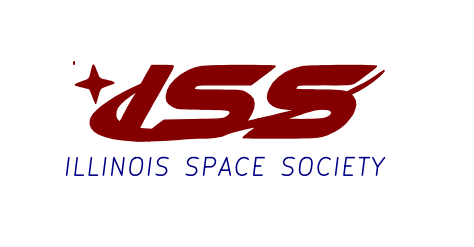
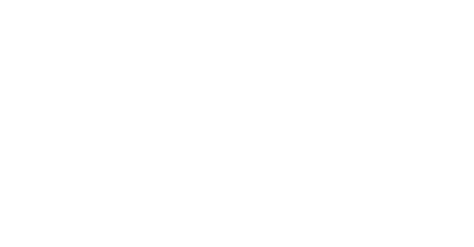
power symbol: (228, 101) -> none
text: ILLINOIS SPACE SOCIETY (225, 166) -> none

